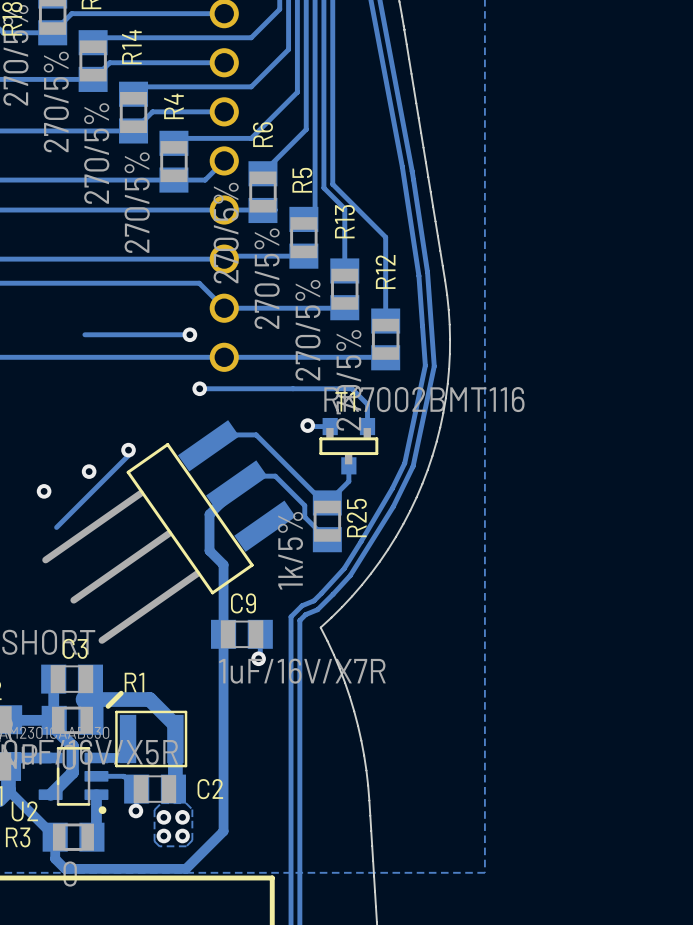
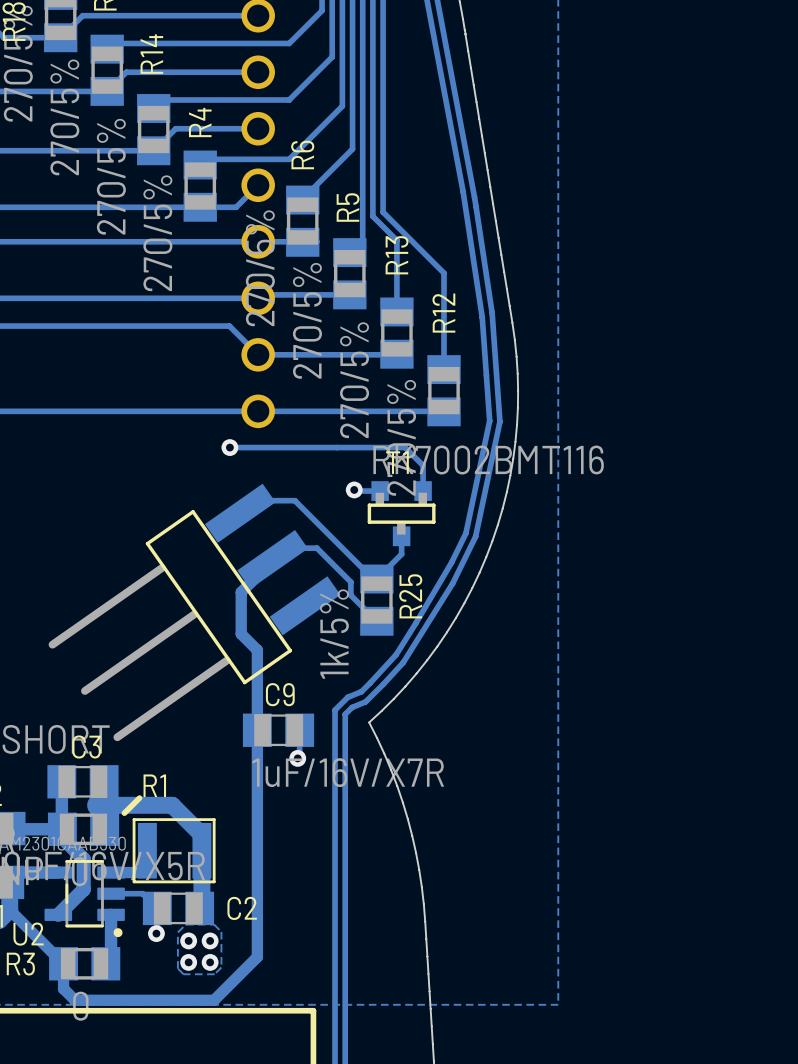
track: (189, 334) (84, 334) -> none
via: (189, 334) -> none
track: (128, 450) (128, 455) (56, 527) -> none
via: (128, 450) -> none
via: (89, 471) -> none
via: (44, 491) -> none

